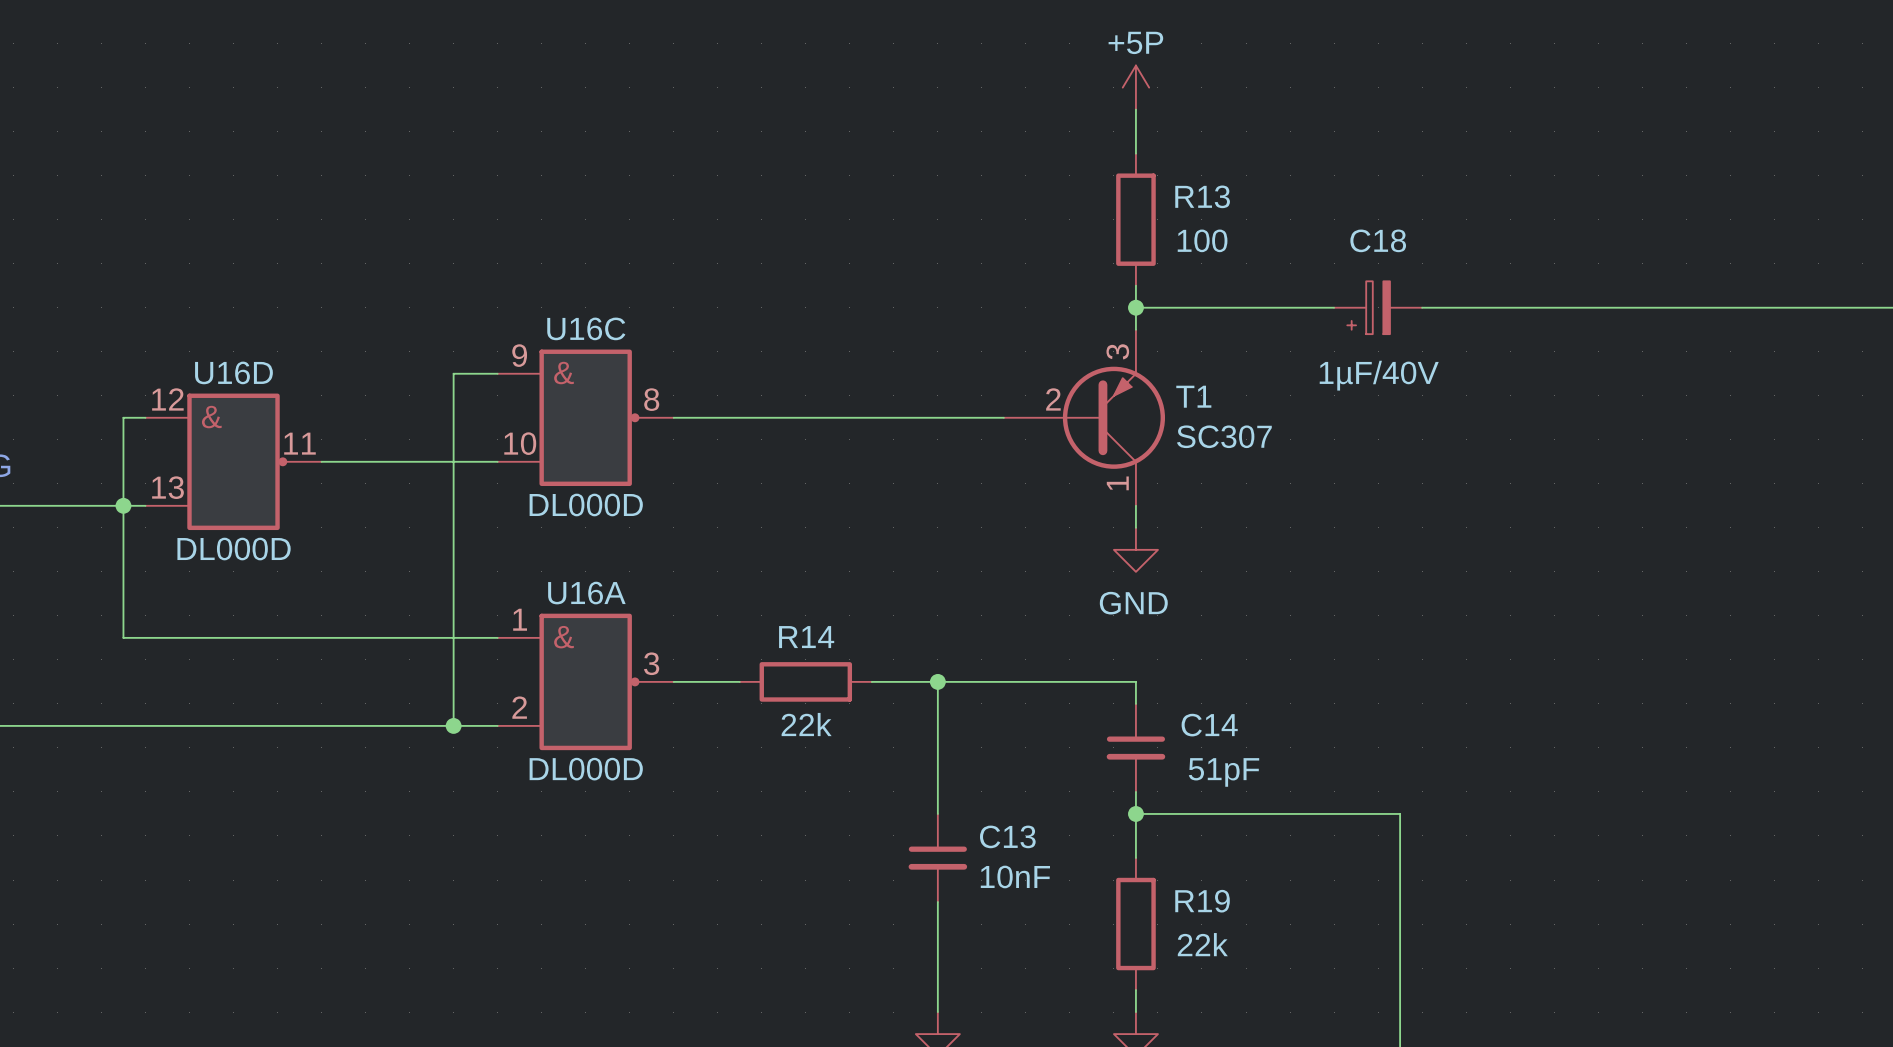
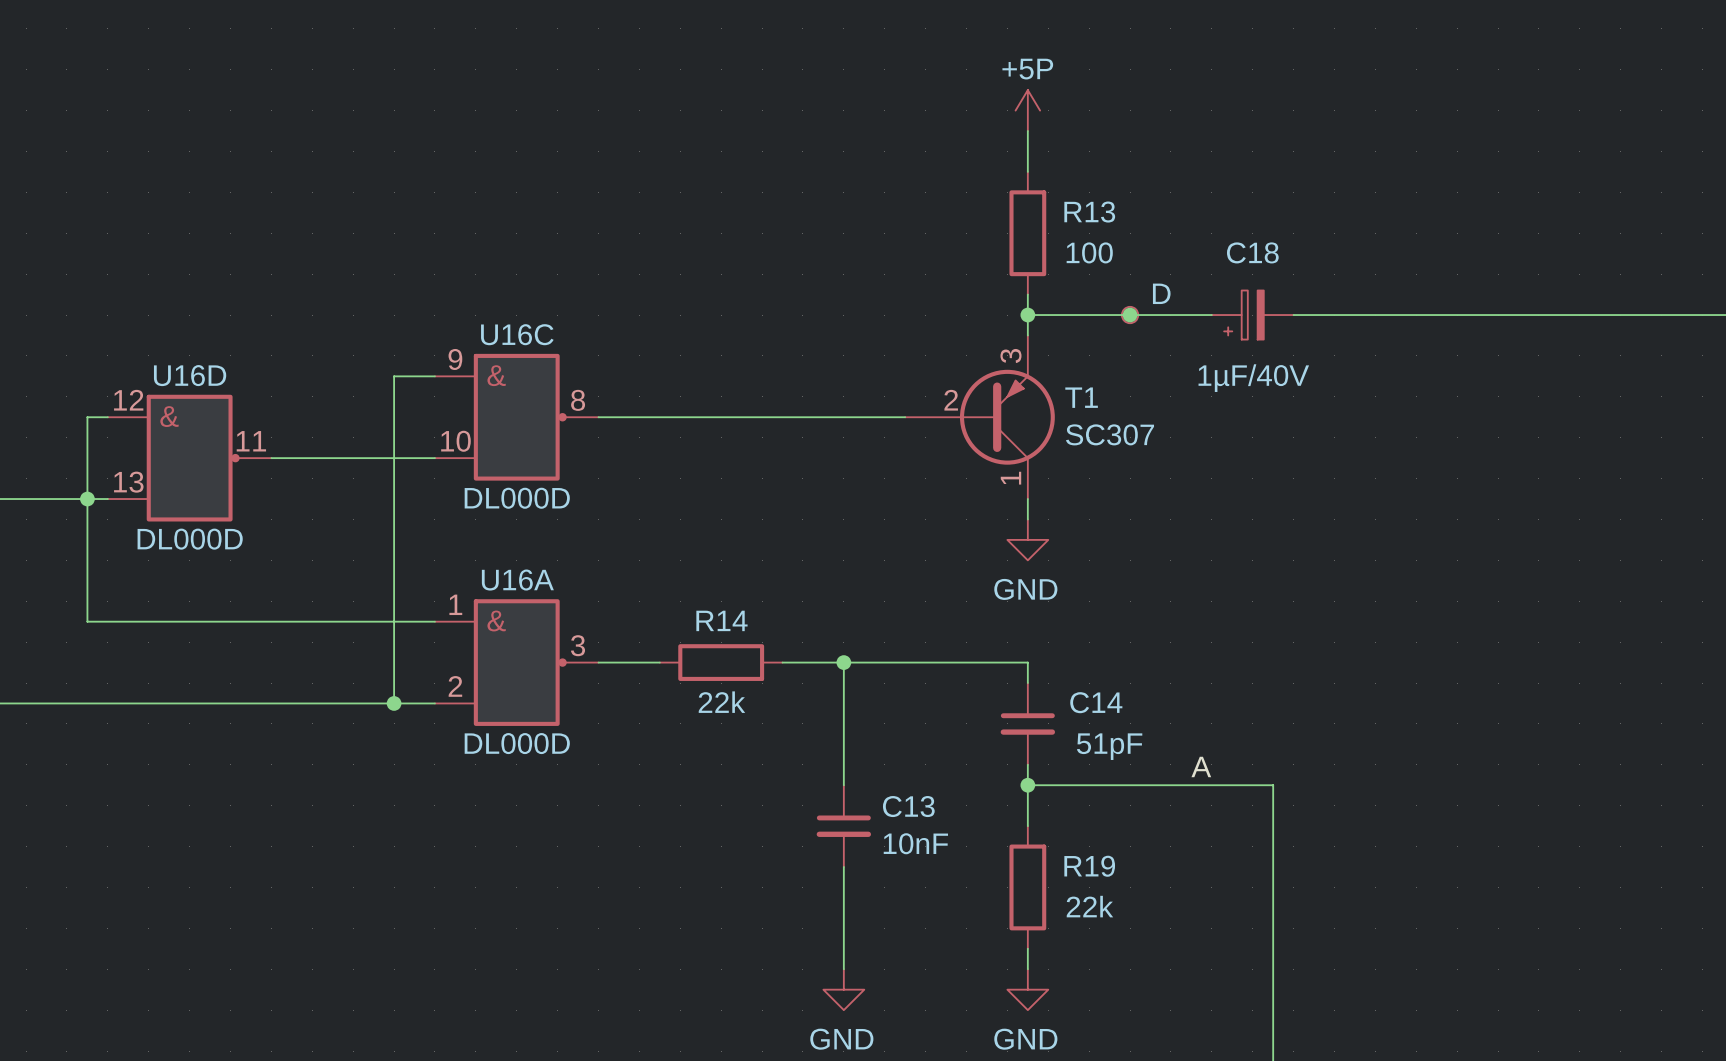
part: none -> D (1130, 315)
junction: none -> (1130, 315)
label: none -> A (1201, 766)

